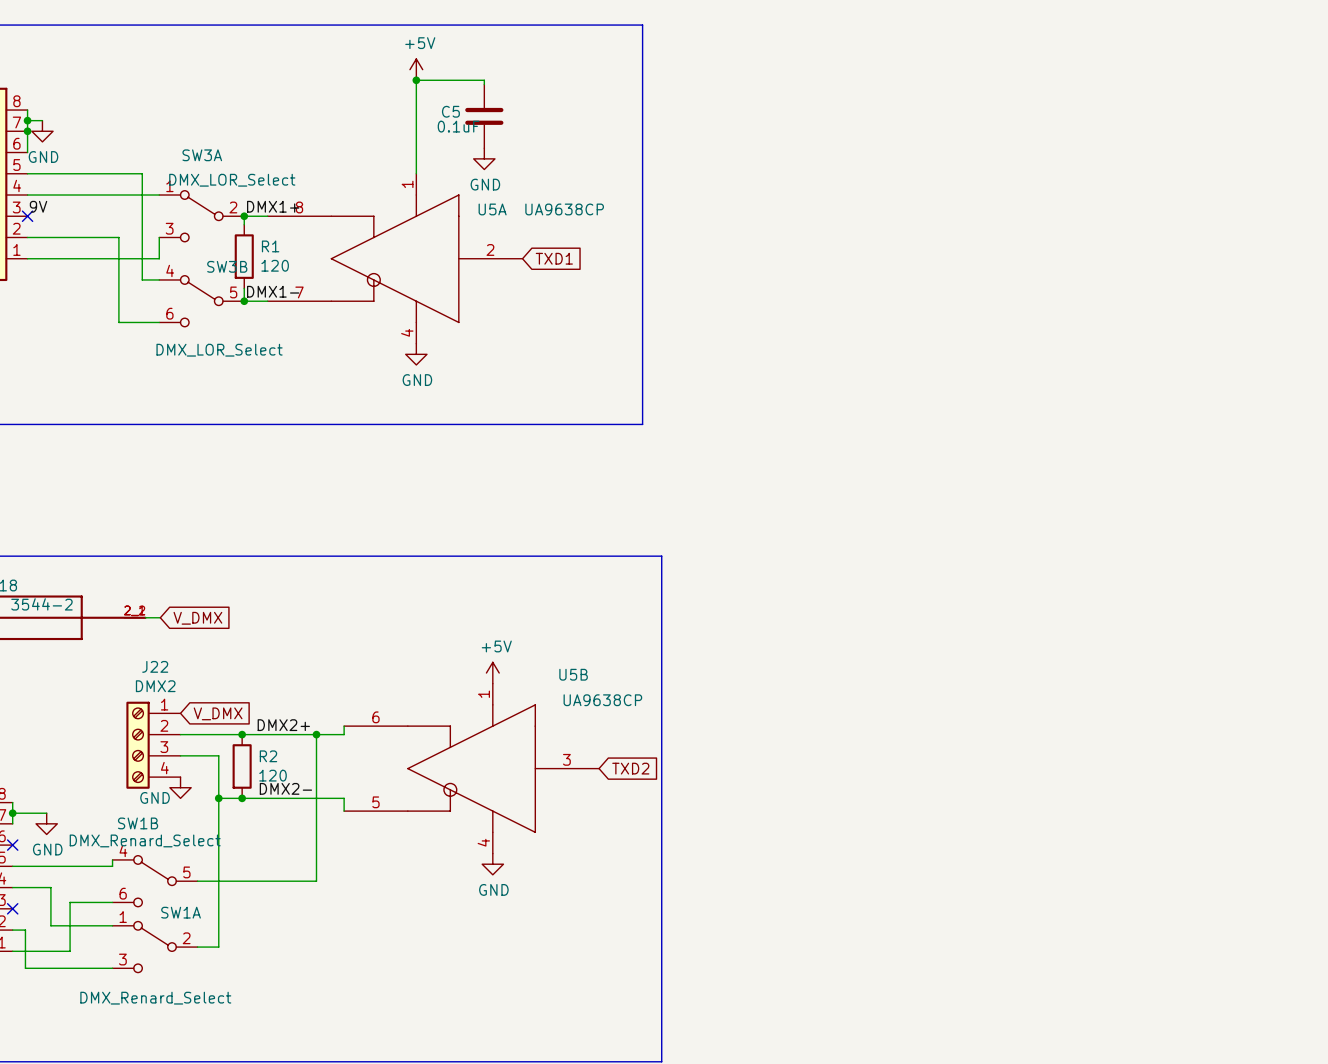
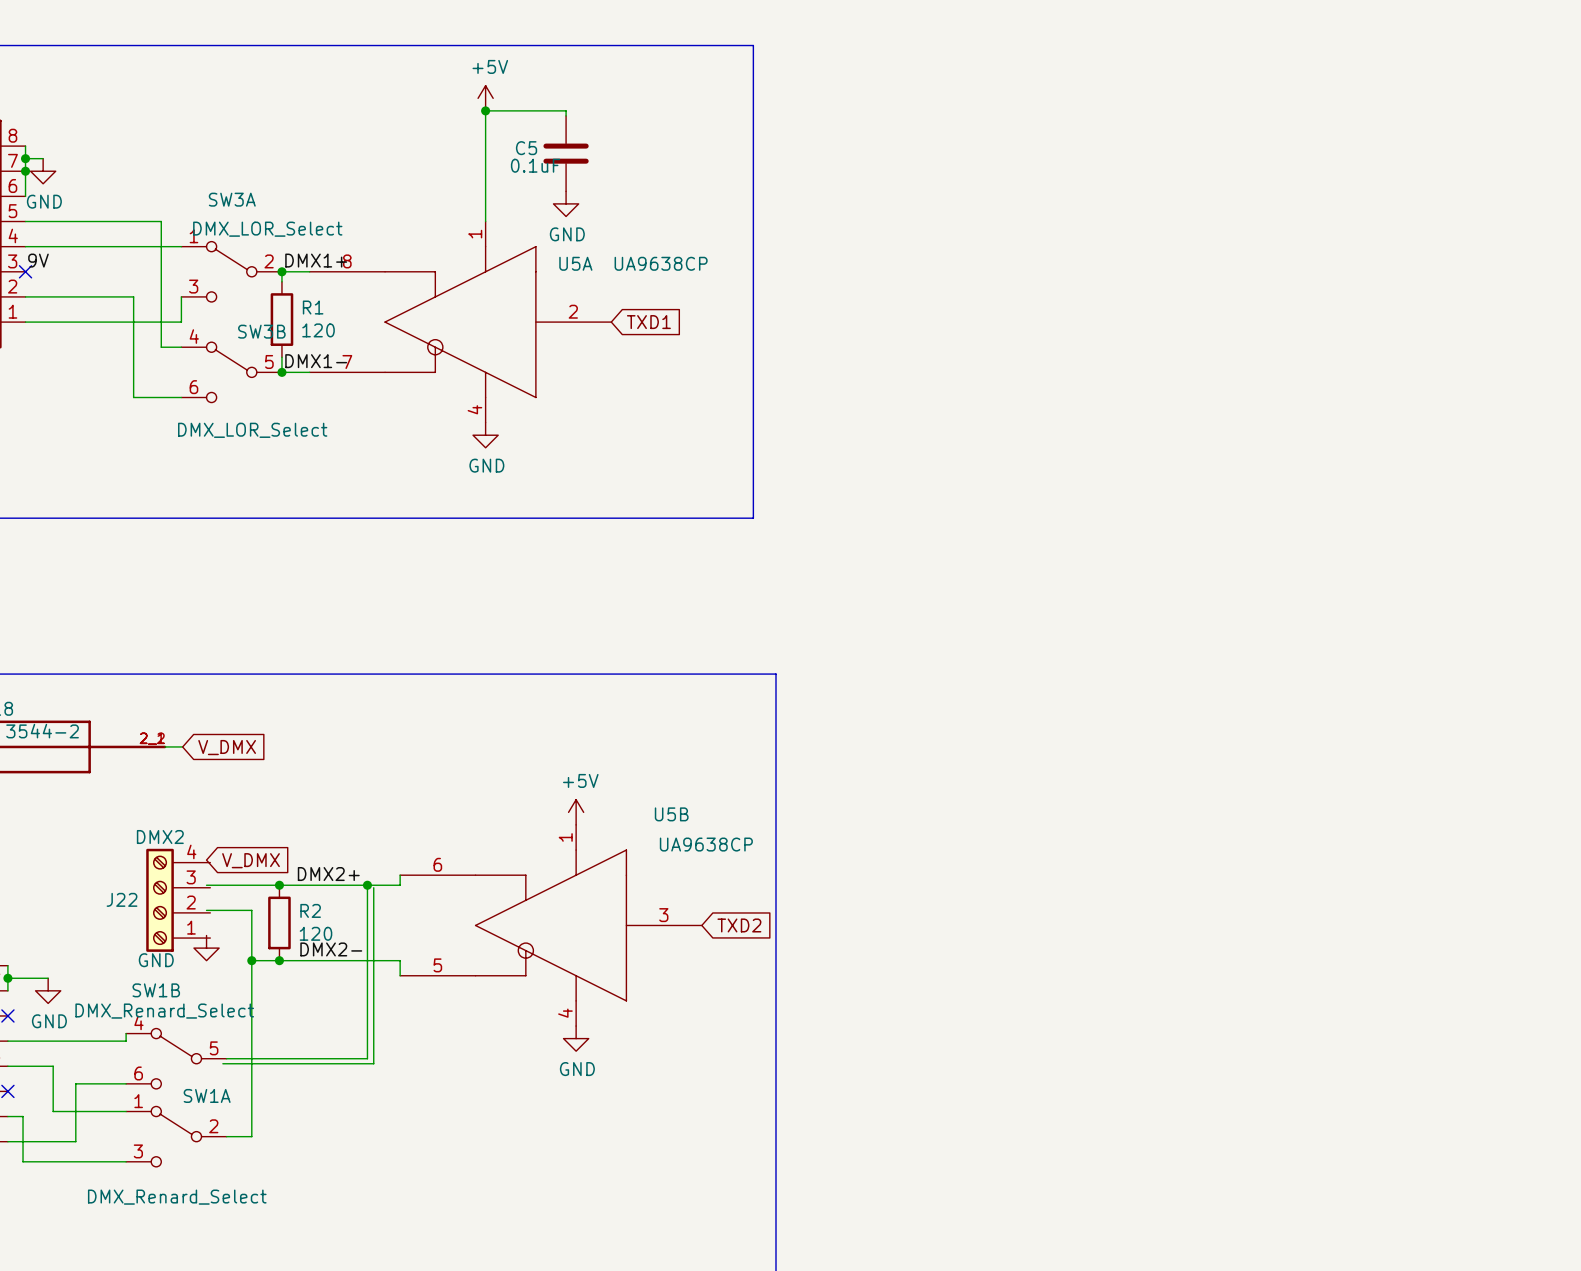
J22 name position: J22 (155, 666) -> J22 (122, 899)
J22 value position: DMX2 (155, 686) -> DMX2 (160, 837)
wire: none -> (373, 887) (373, 1063) (222, 1063)
J22 flip: as is (138, 745) -> up-down (160, 900)
power symbol text position: GND (155, 797) -> GND (156, 960)

